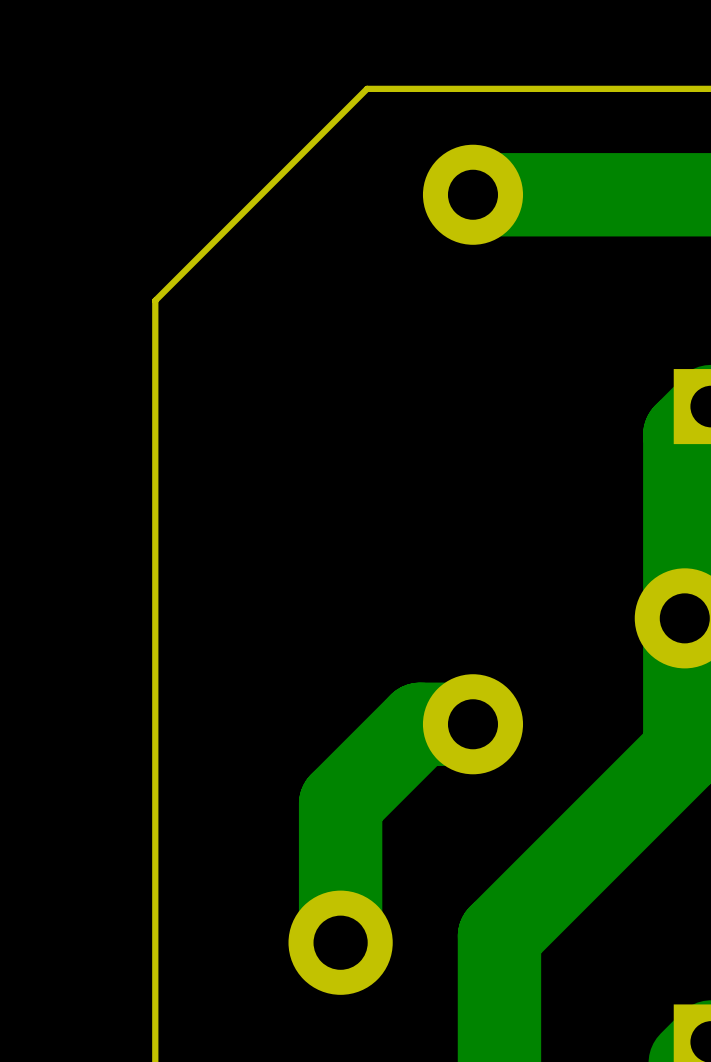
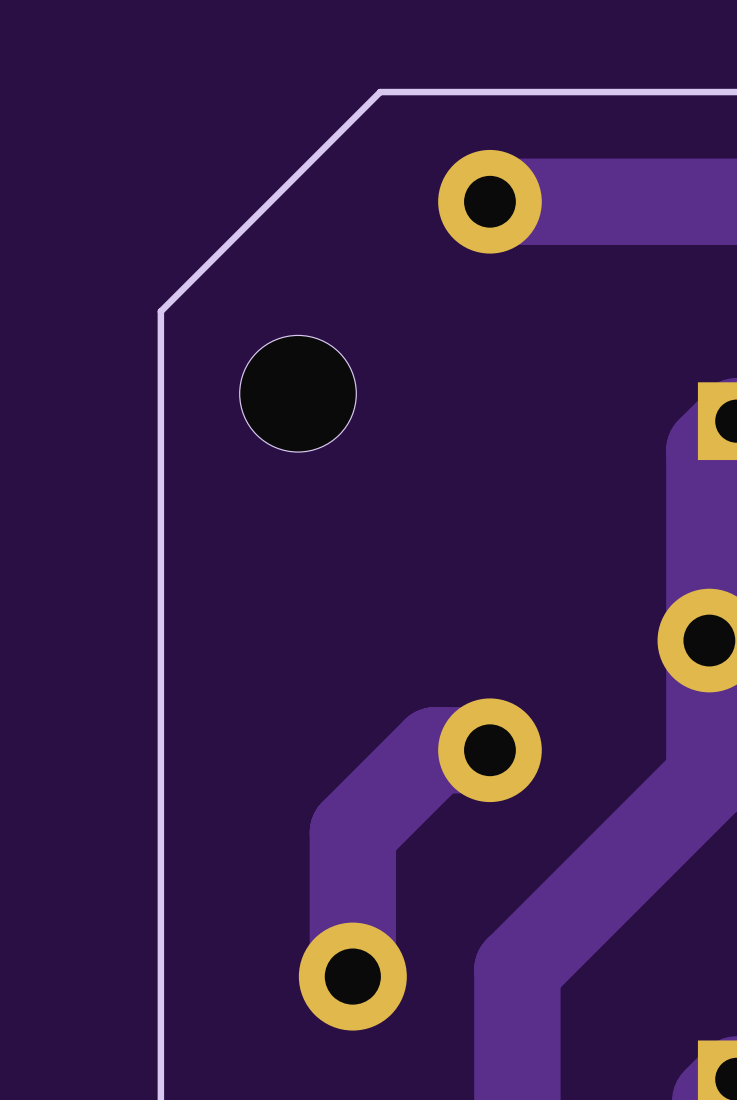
part: none -> (297, 393)

